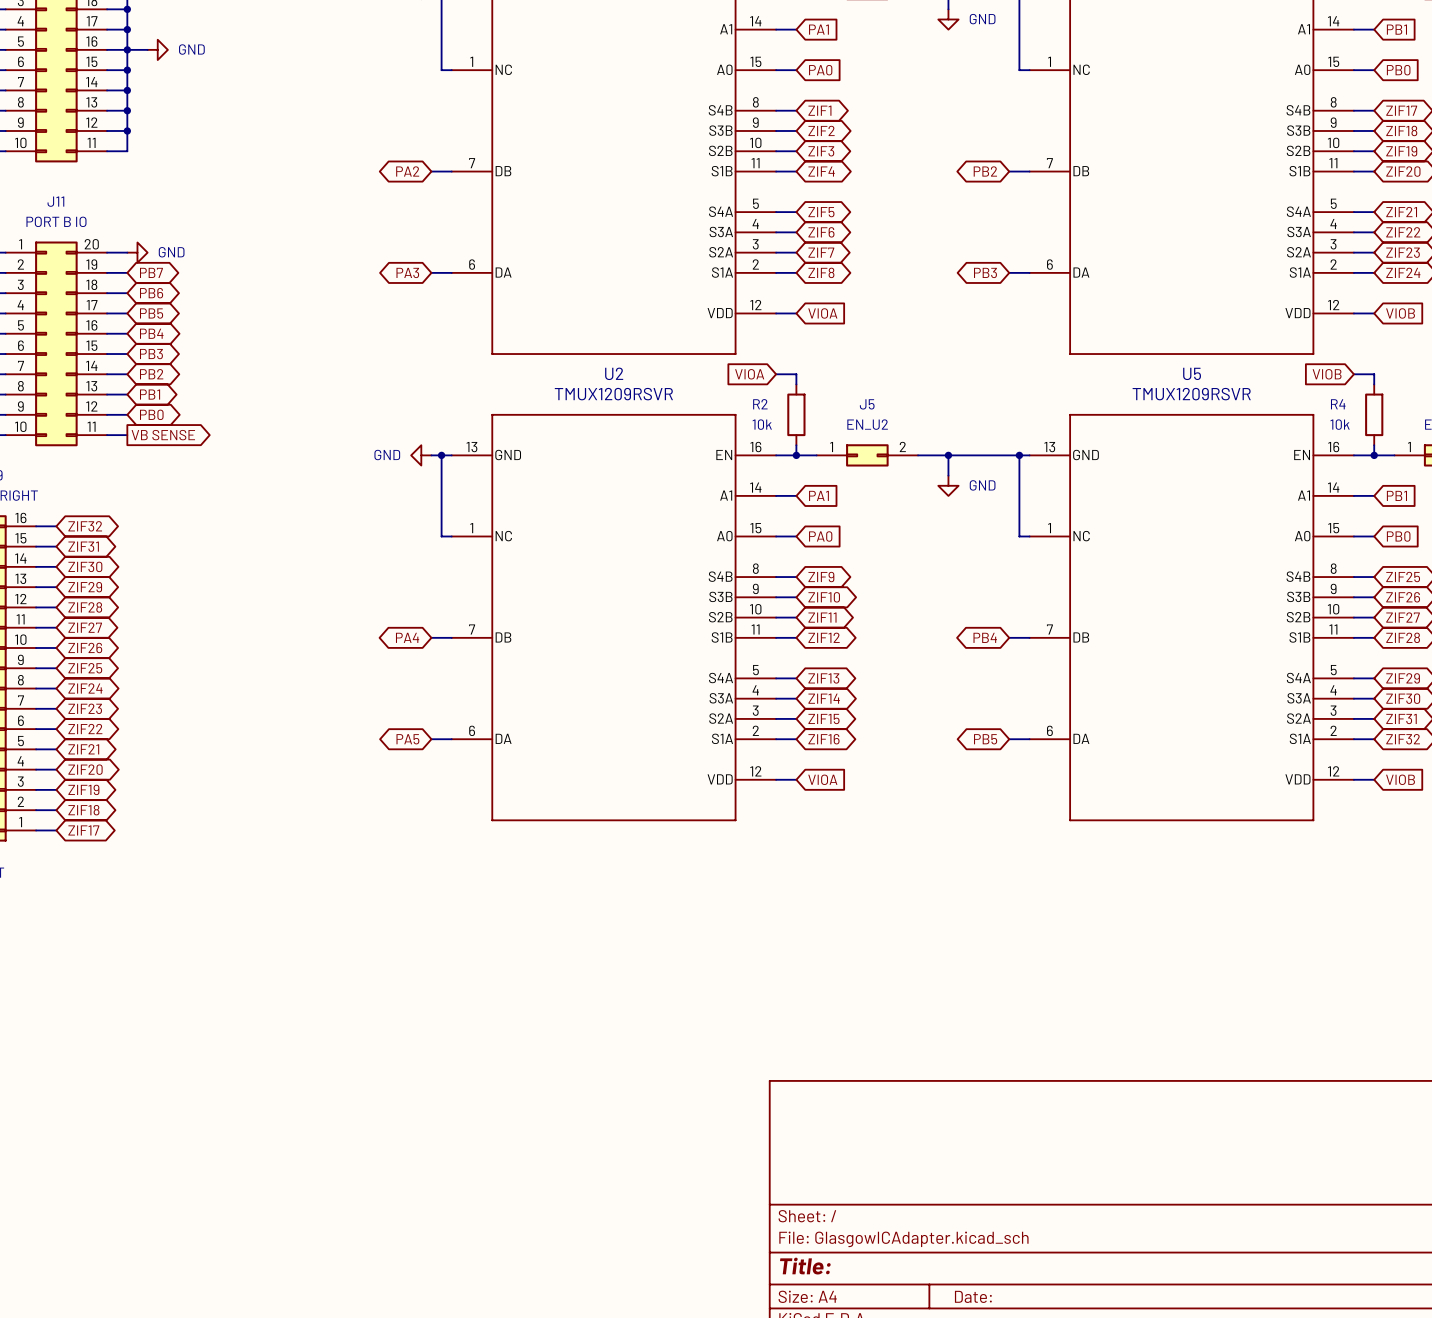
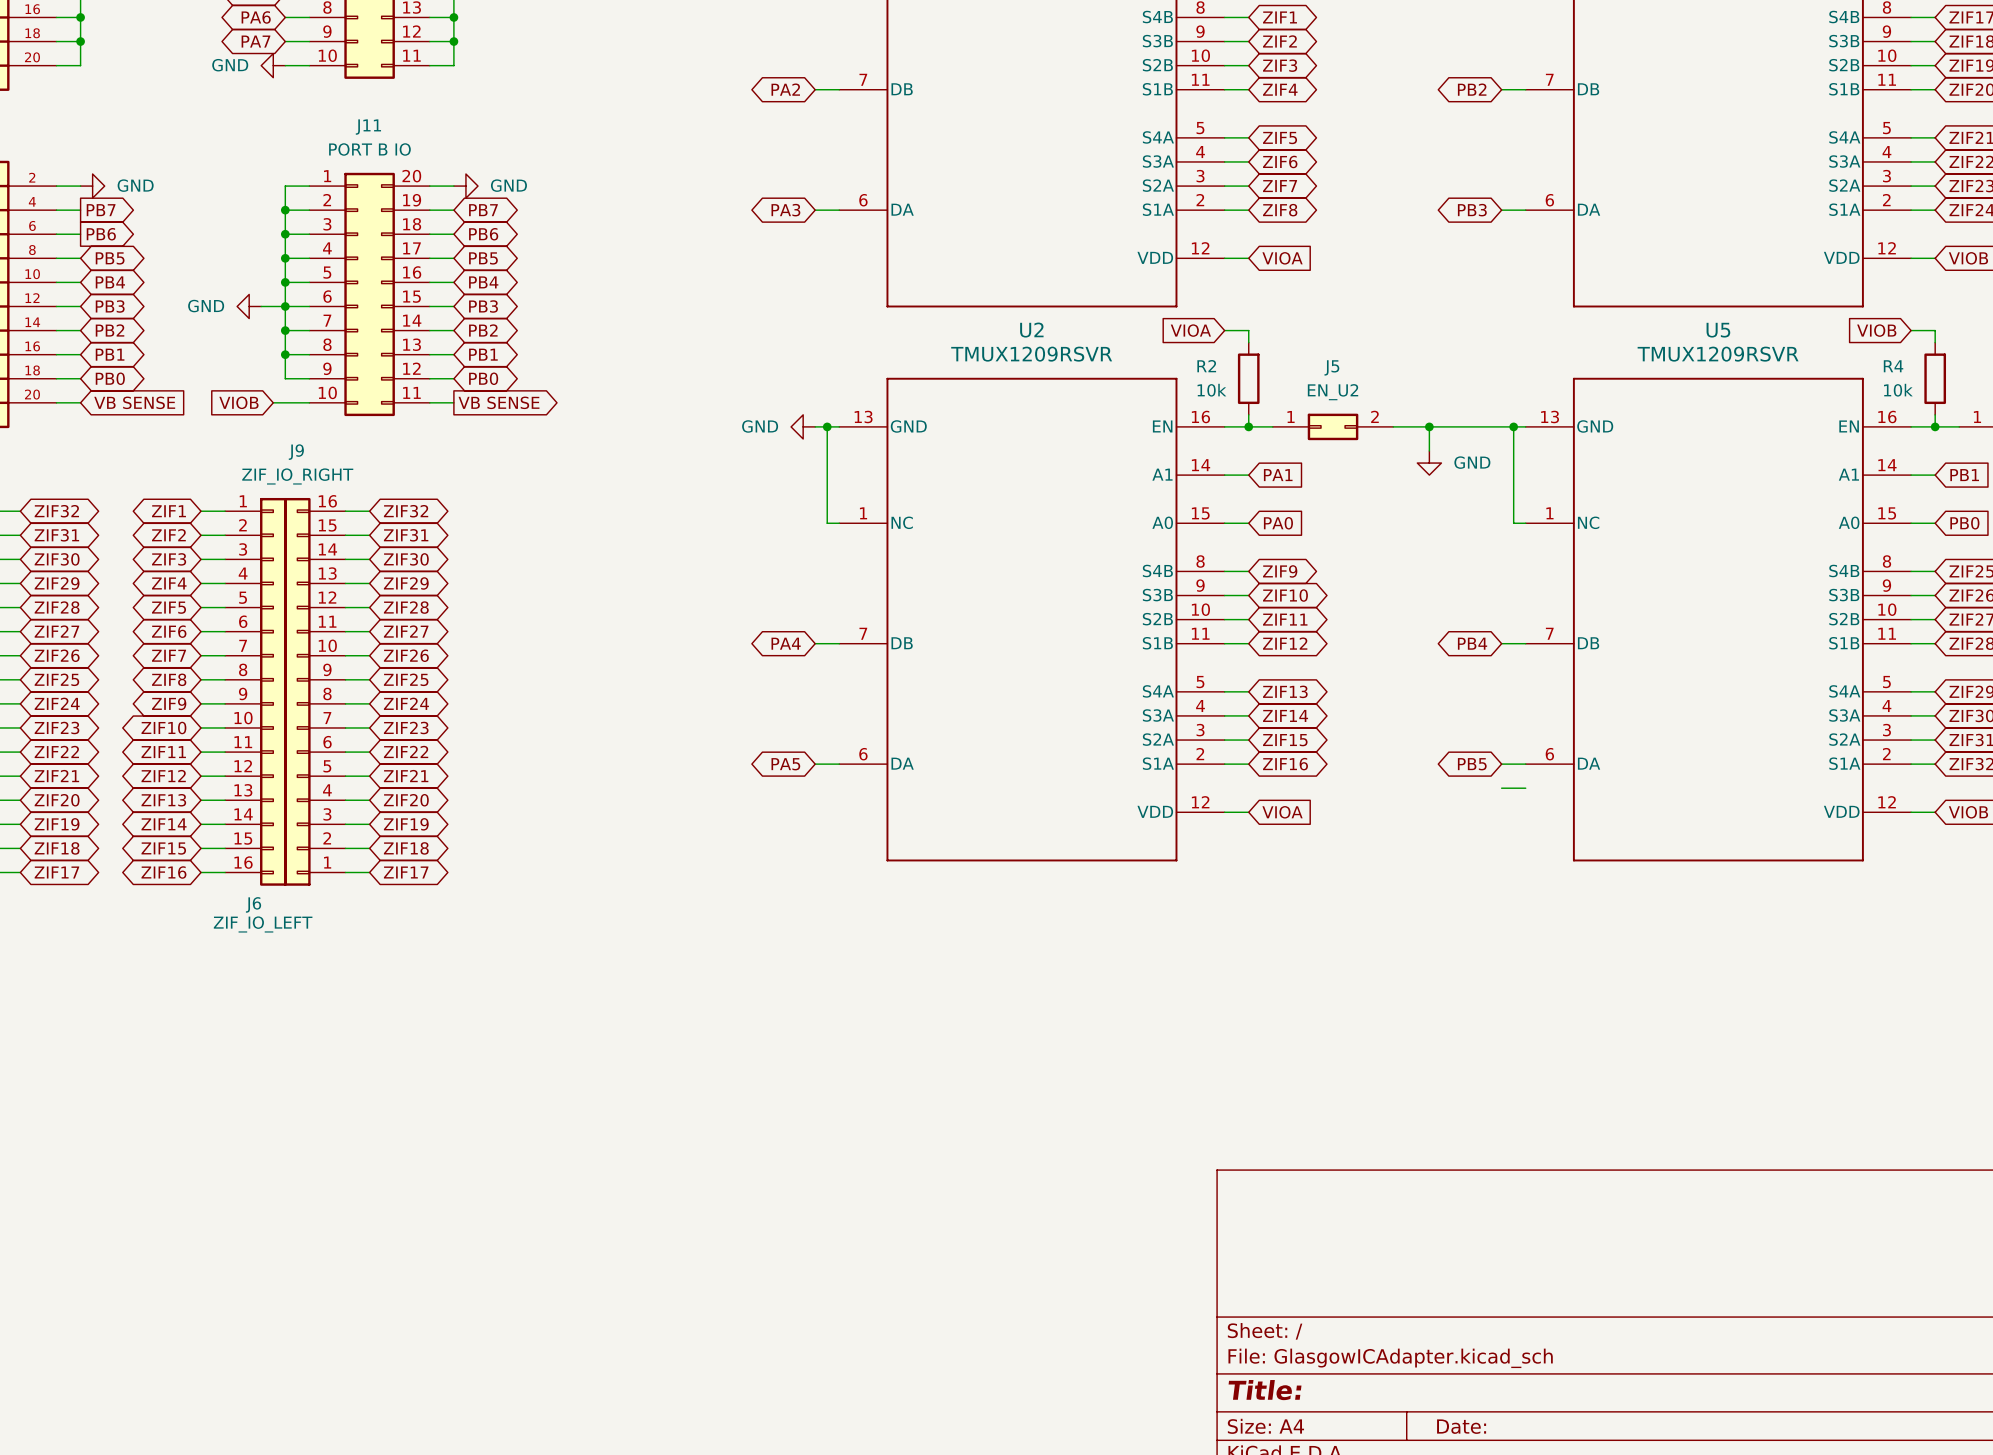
wire: none -> (1501, 788) (1525, 788)

